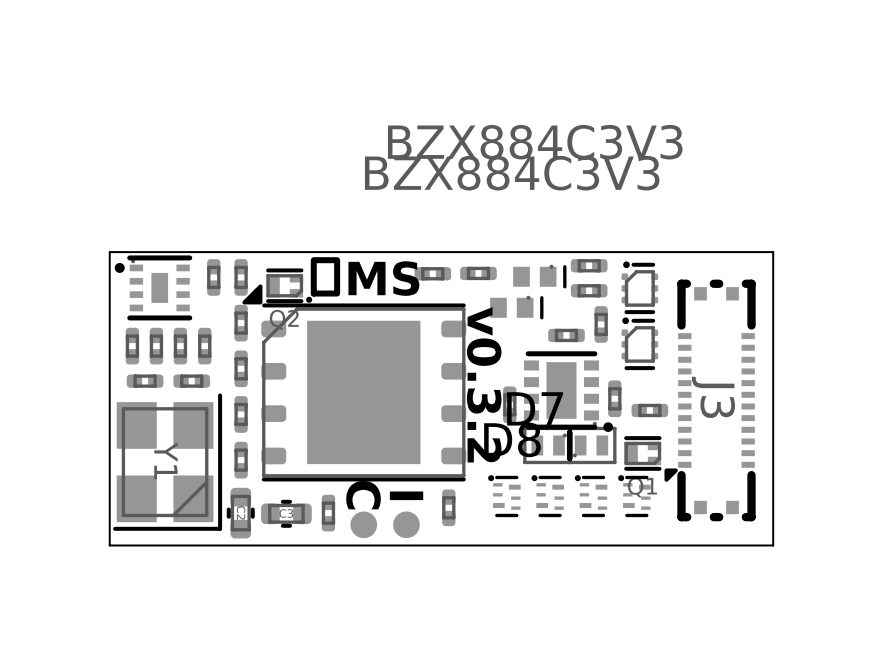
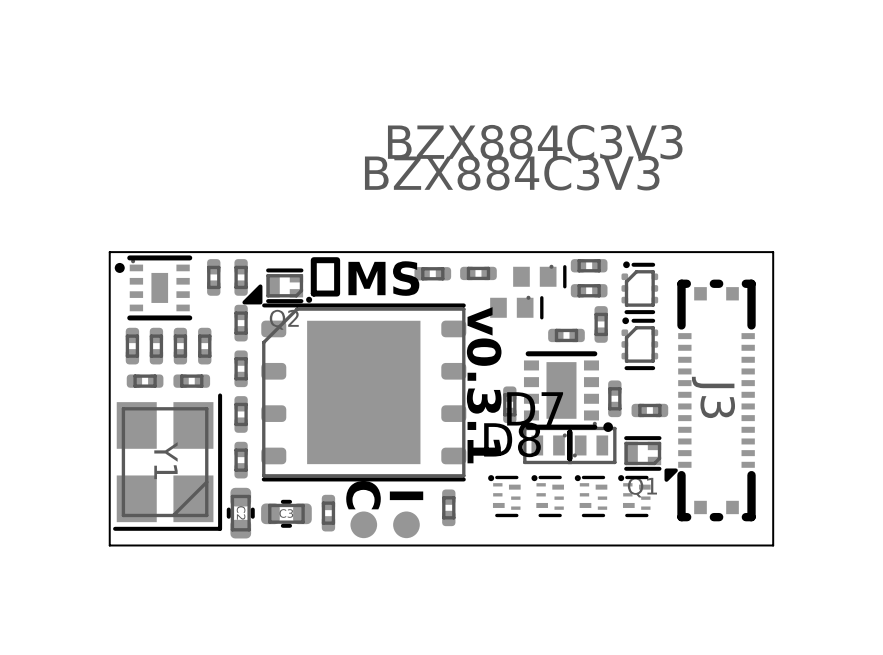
text: v0.3.2 (484, 384) -> v0.3.1 (484, 385)

